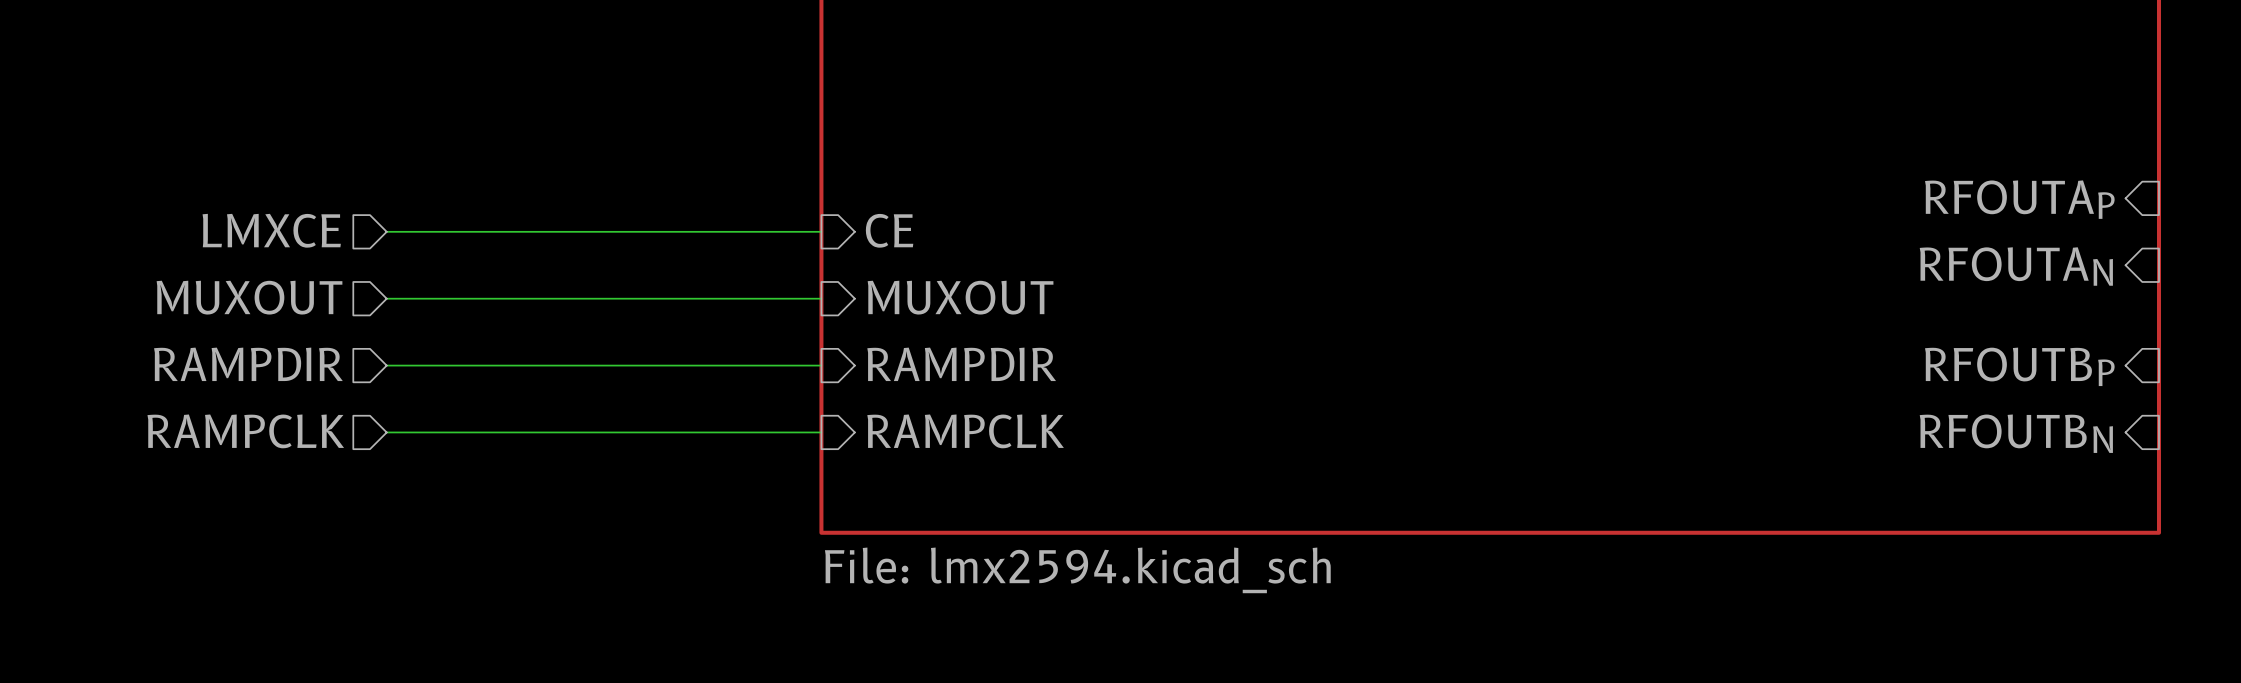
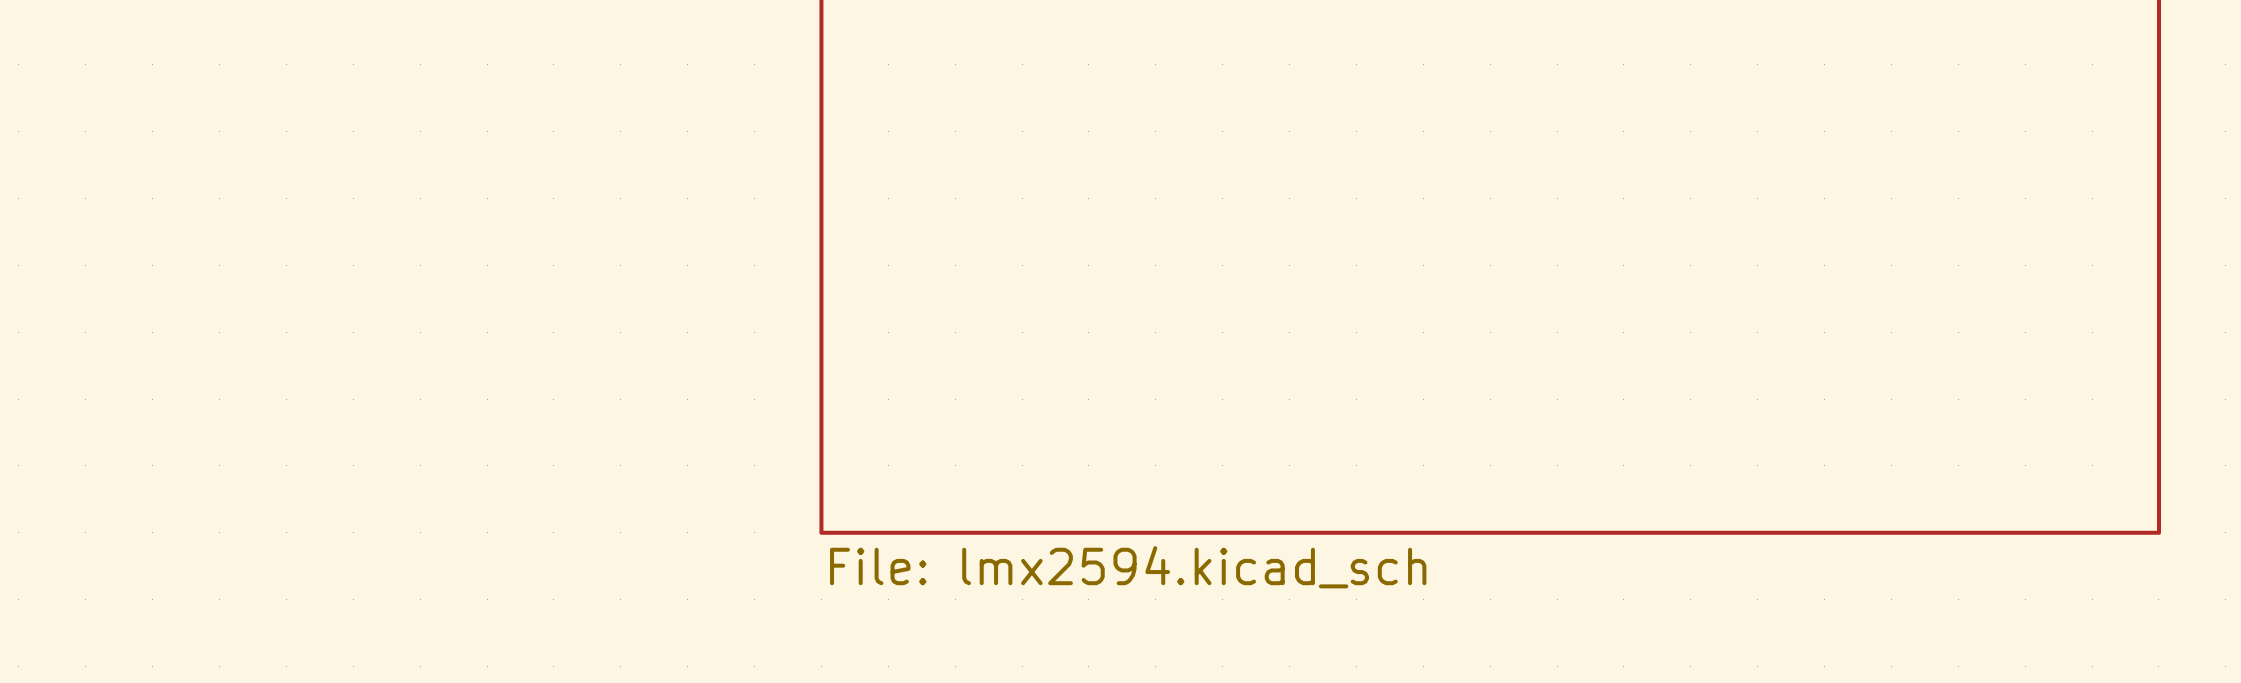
sheet pin: RFOUTAP (2019, 199) -> none
hierarchical label: LMXCE (271, 230) -> none
sheet pin: CE (889, 230) -> none
wire: (386, 231) (821, 231) -> none
sheet pin: RFOUTAN (2016, 266) -> none
hierarchical label: MUXOUT (249, 297) -> none
sheet pin: MUXOUT (960, 297) -> none
wire: (386, 298) (821, 298) -> none
hierarchical label: RAMPDIR (248, 364) -> none
sheet pin: RAMPDIR (961, 364) -> none
wire: (386, 365) (821, 365) -> none
sheet pin: RFOUTBP (2019, 366) -> none
hierarchical label: RAMPCLK (245, 431) -> none
sheet pin: RAMPCLK (965, 431) -> none
wire: (386, 432) (821, 432) -> none
sheet pin: RFOUTBN (2016, 433) -> none

